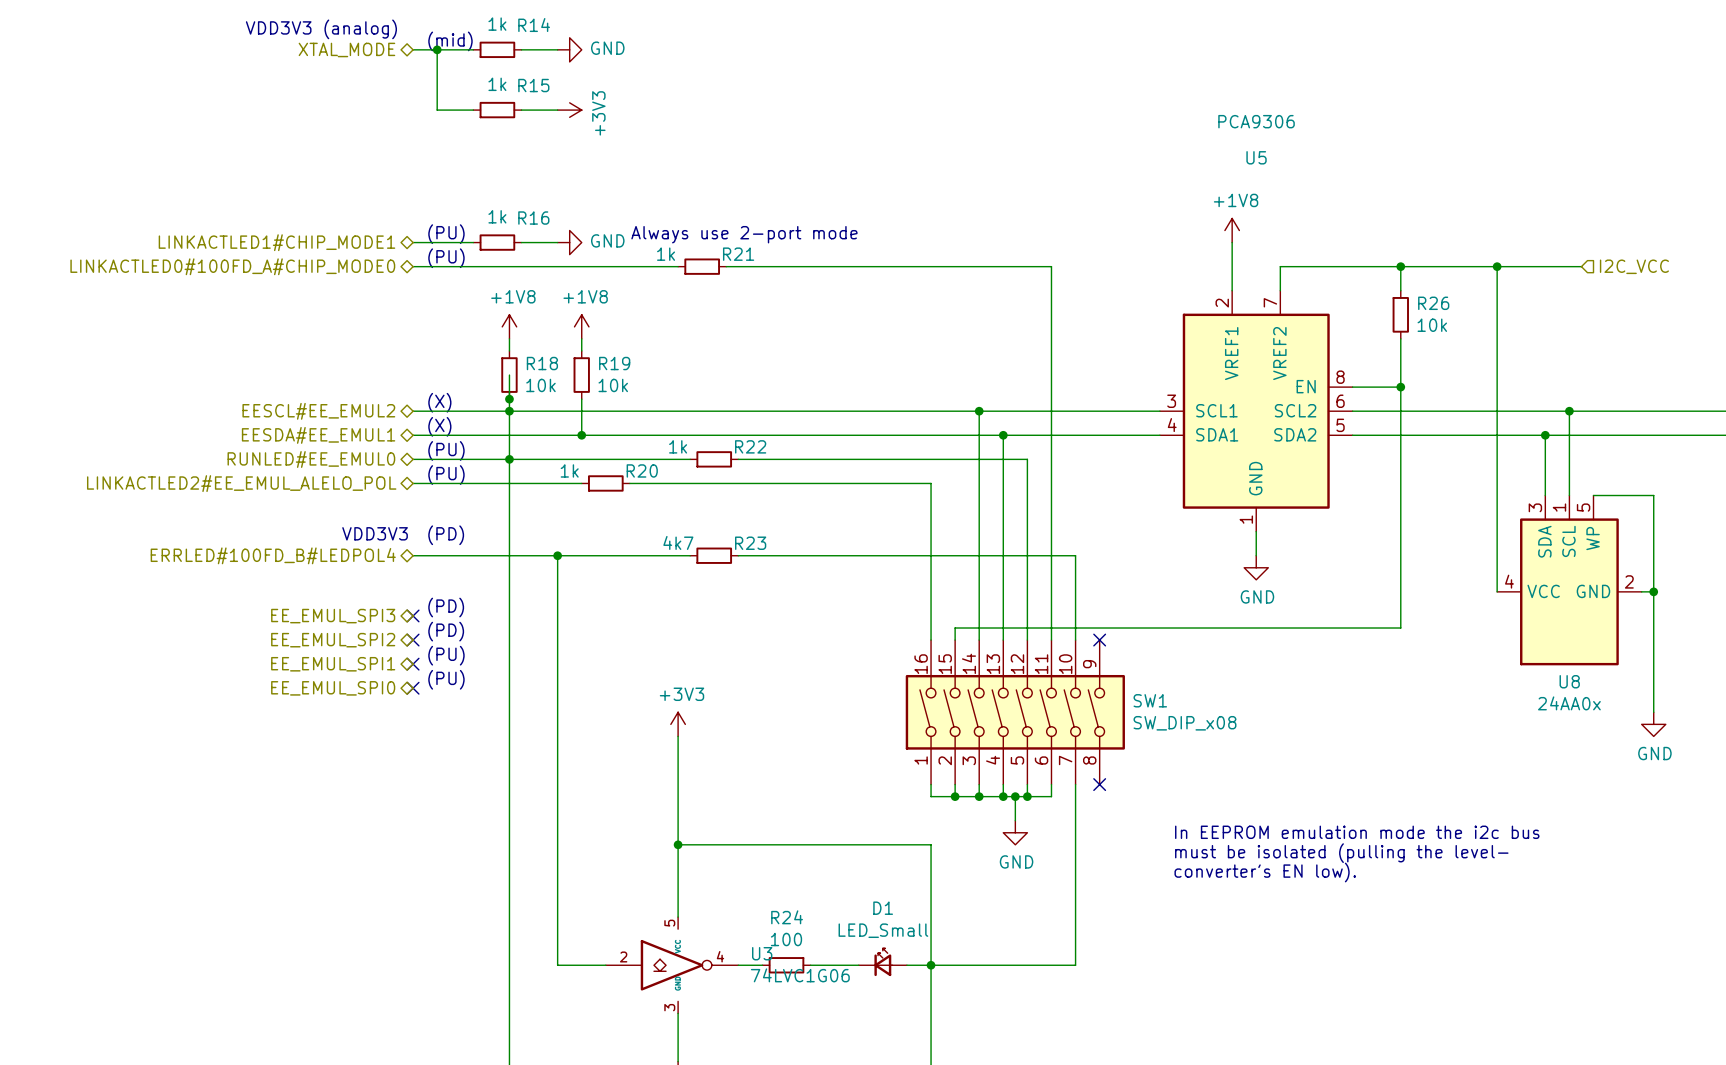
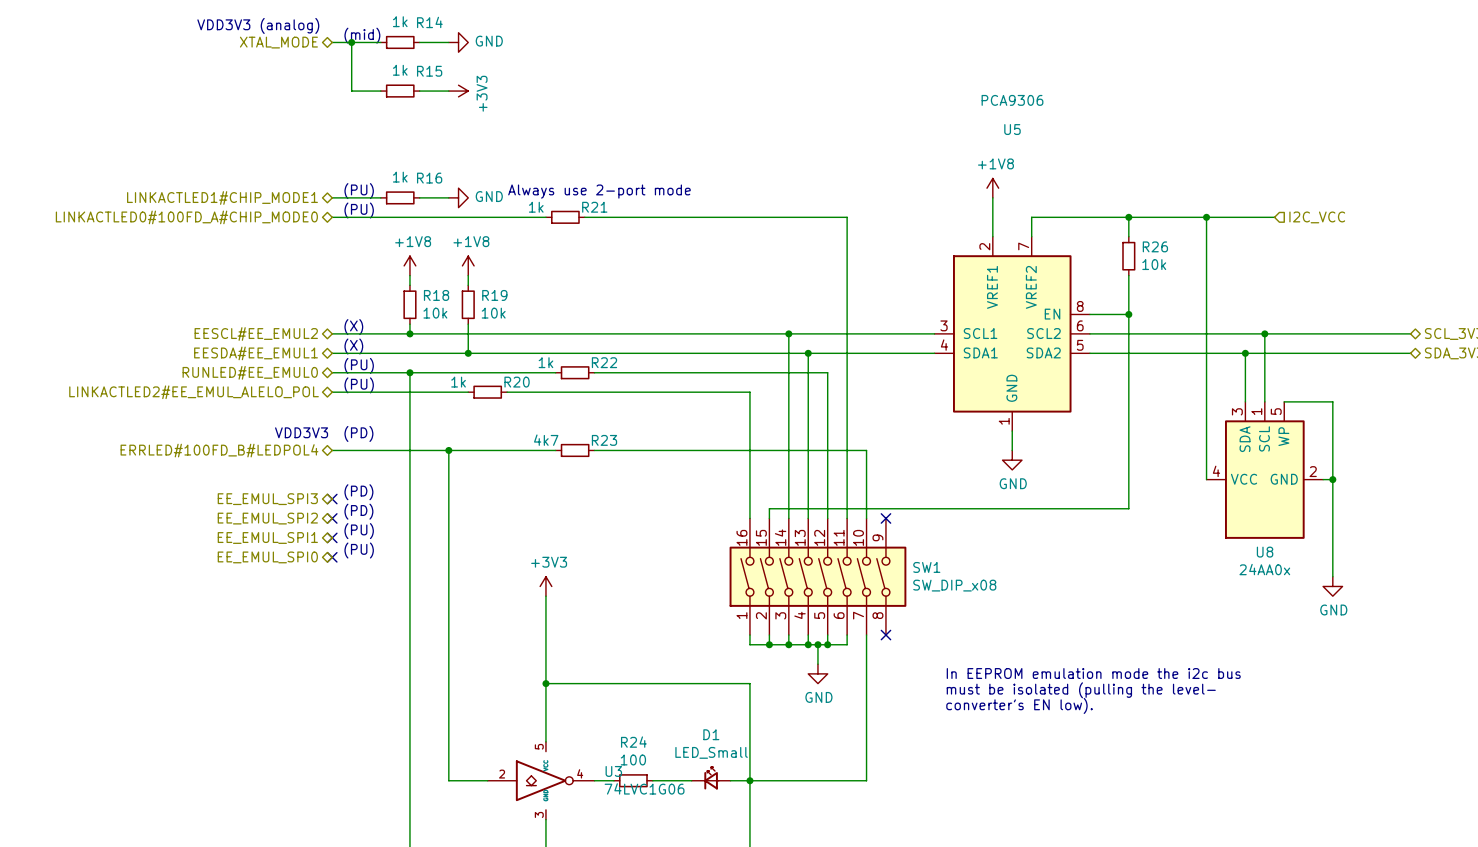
wire: (509, 375) (509, 399) -> none
junction: (509, 399) -> none
wire: (509, 411) (509, 459) -> none

